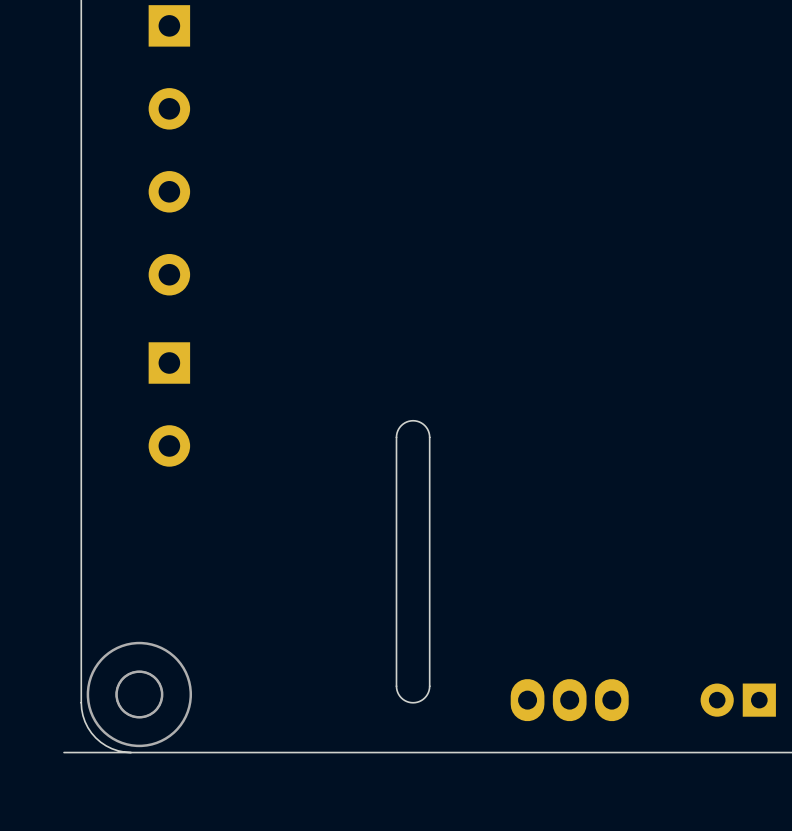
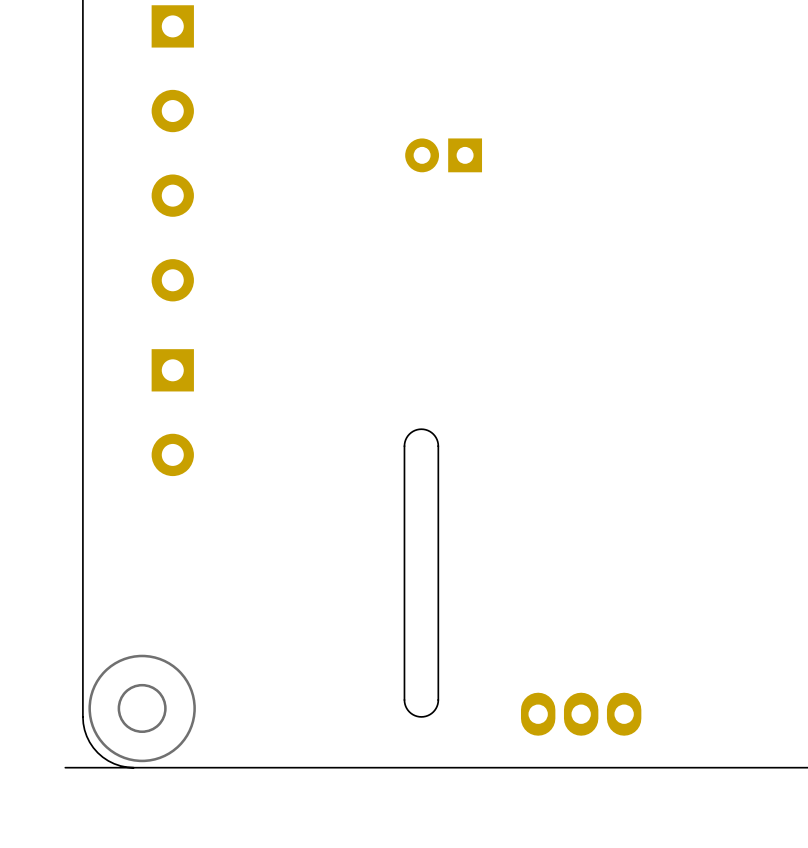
part: none -> (443, 155)
part: (738, 700) -> none

